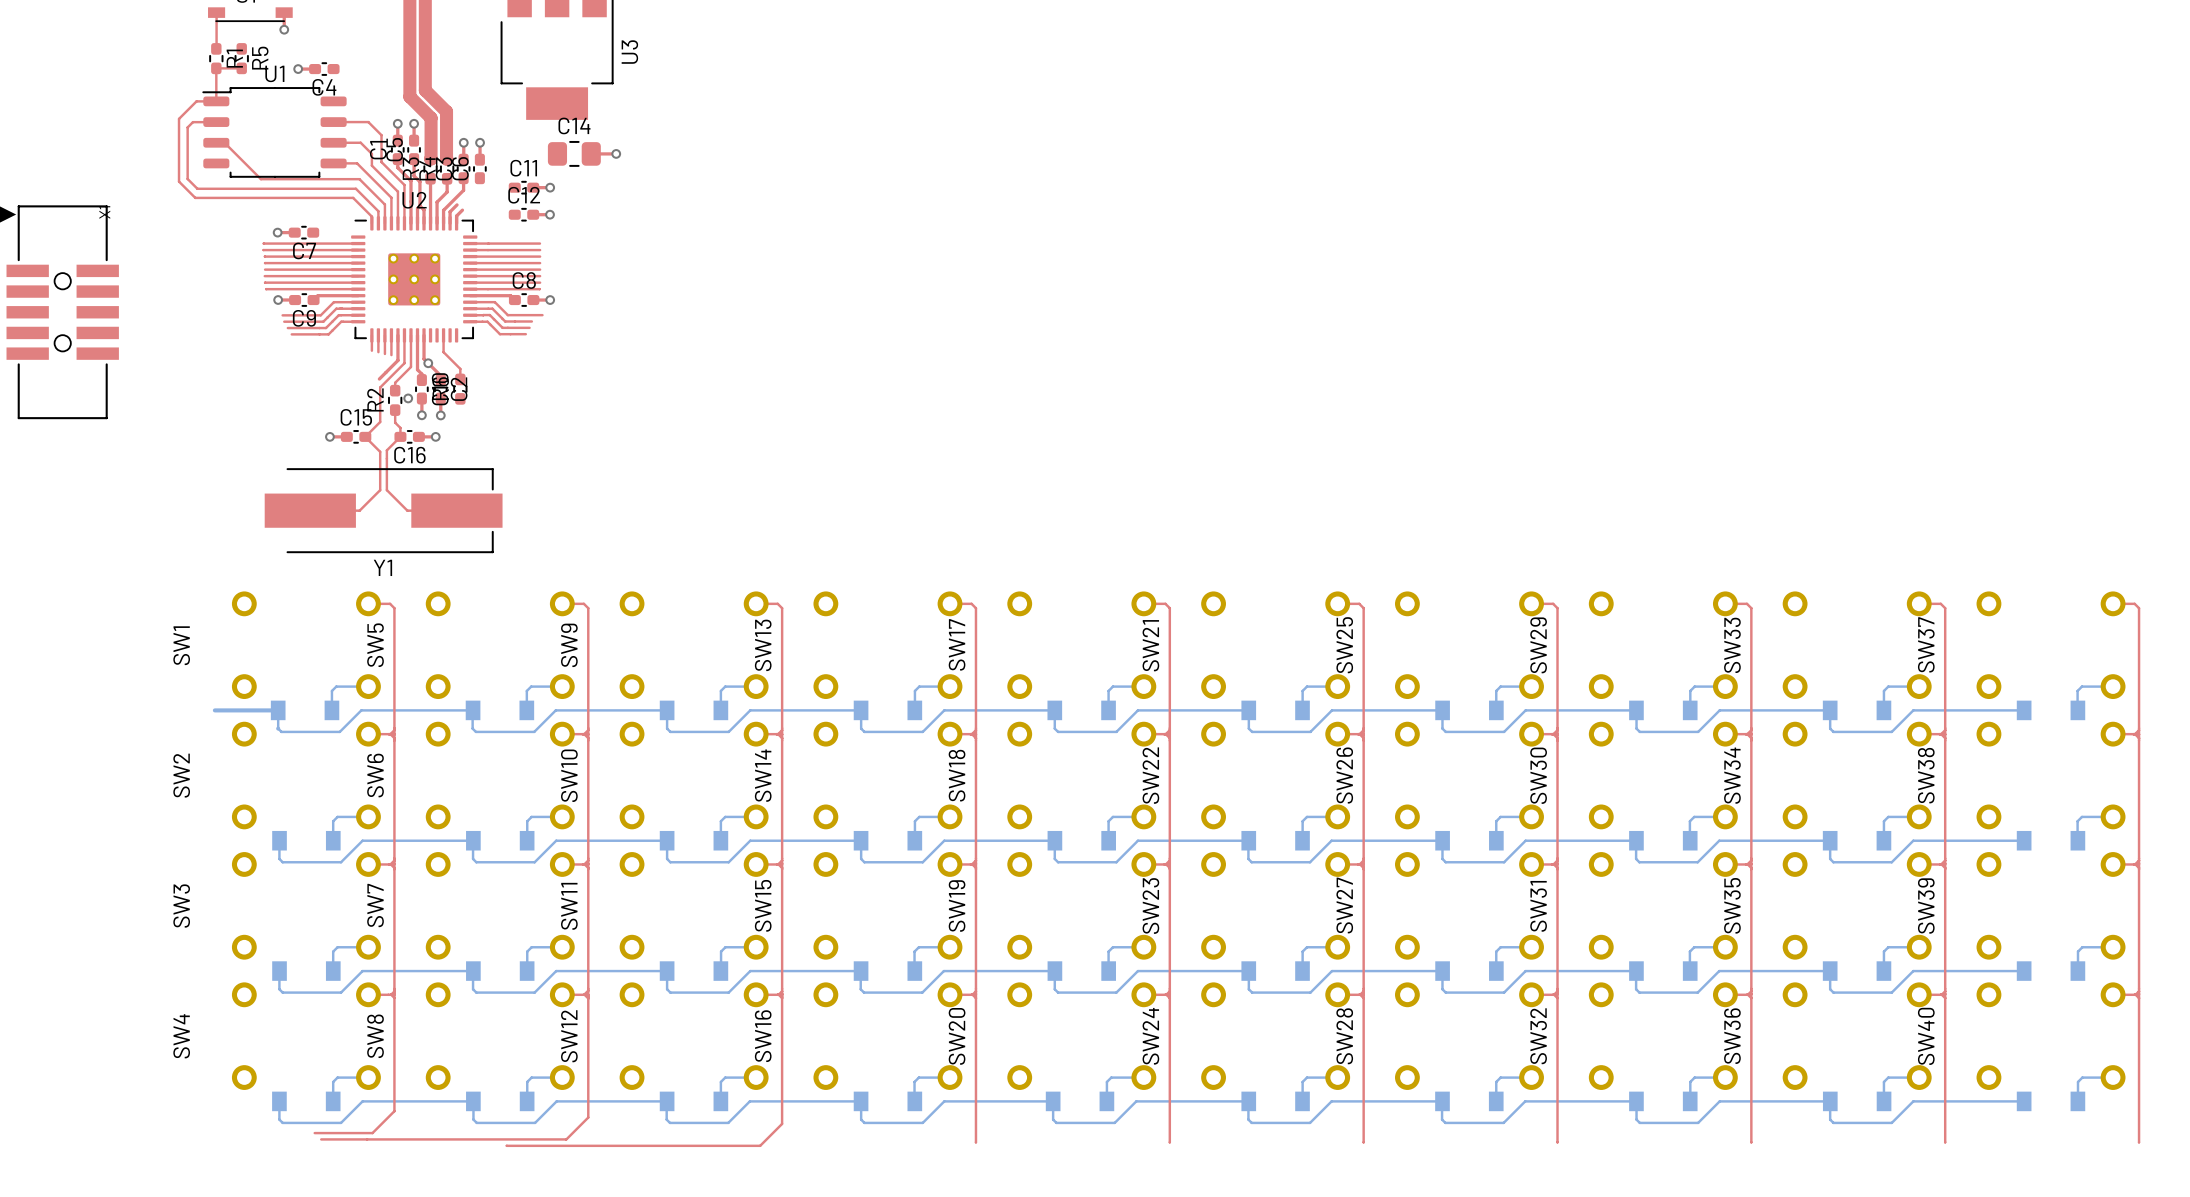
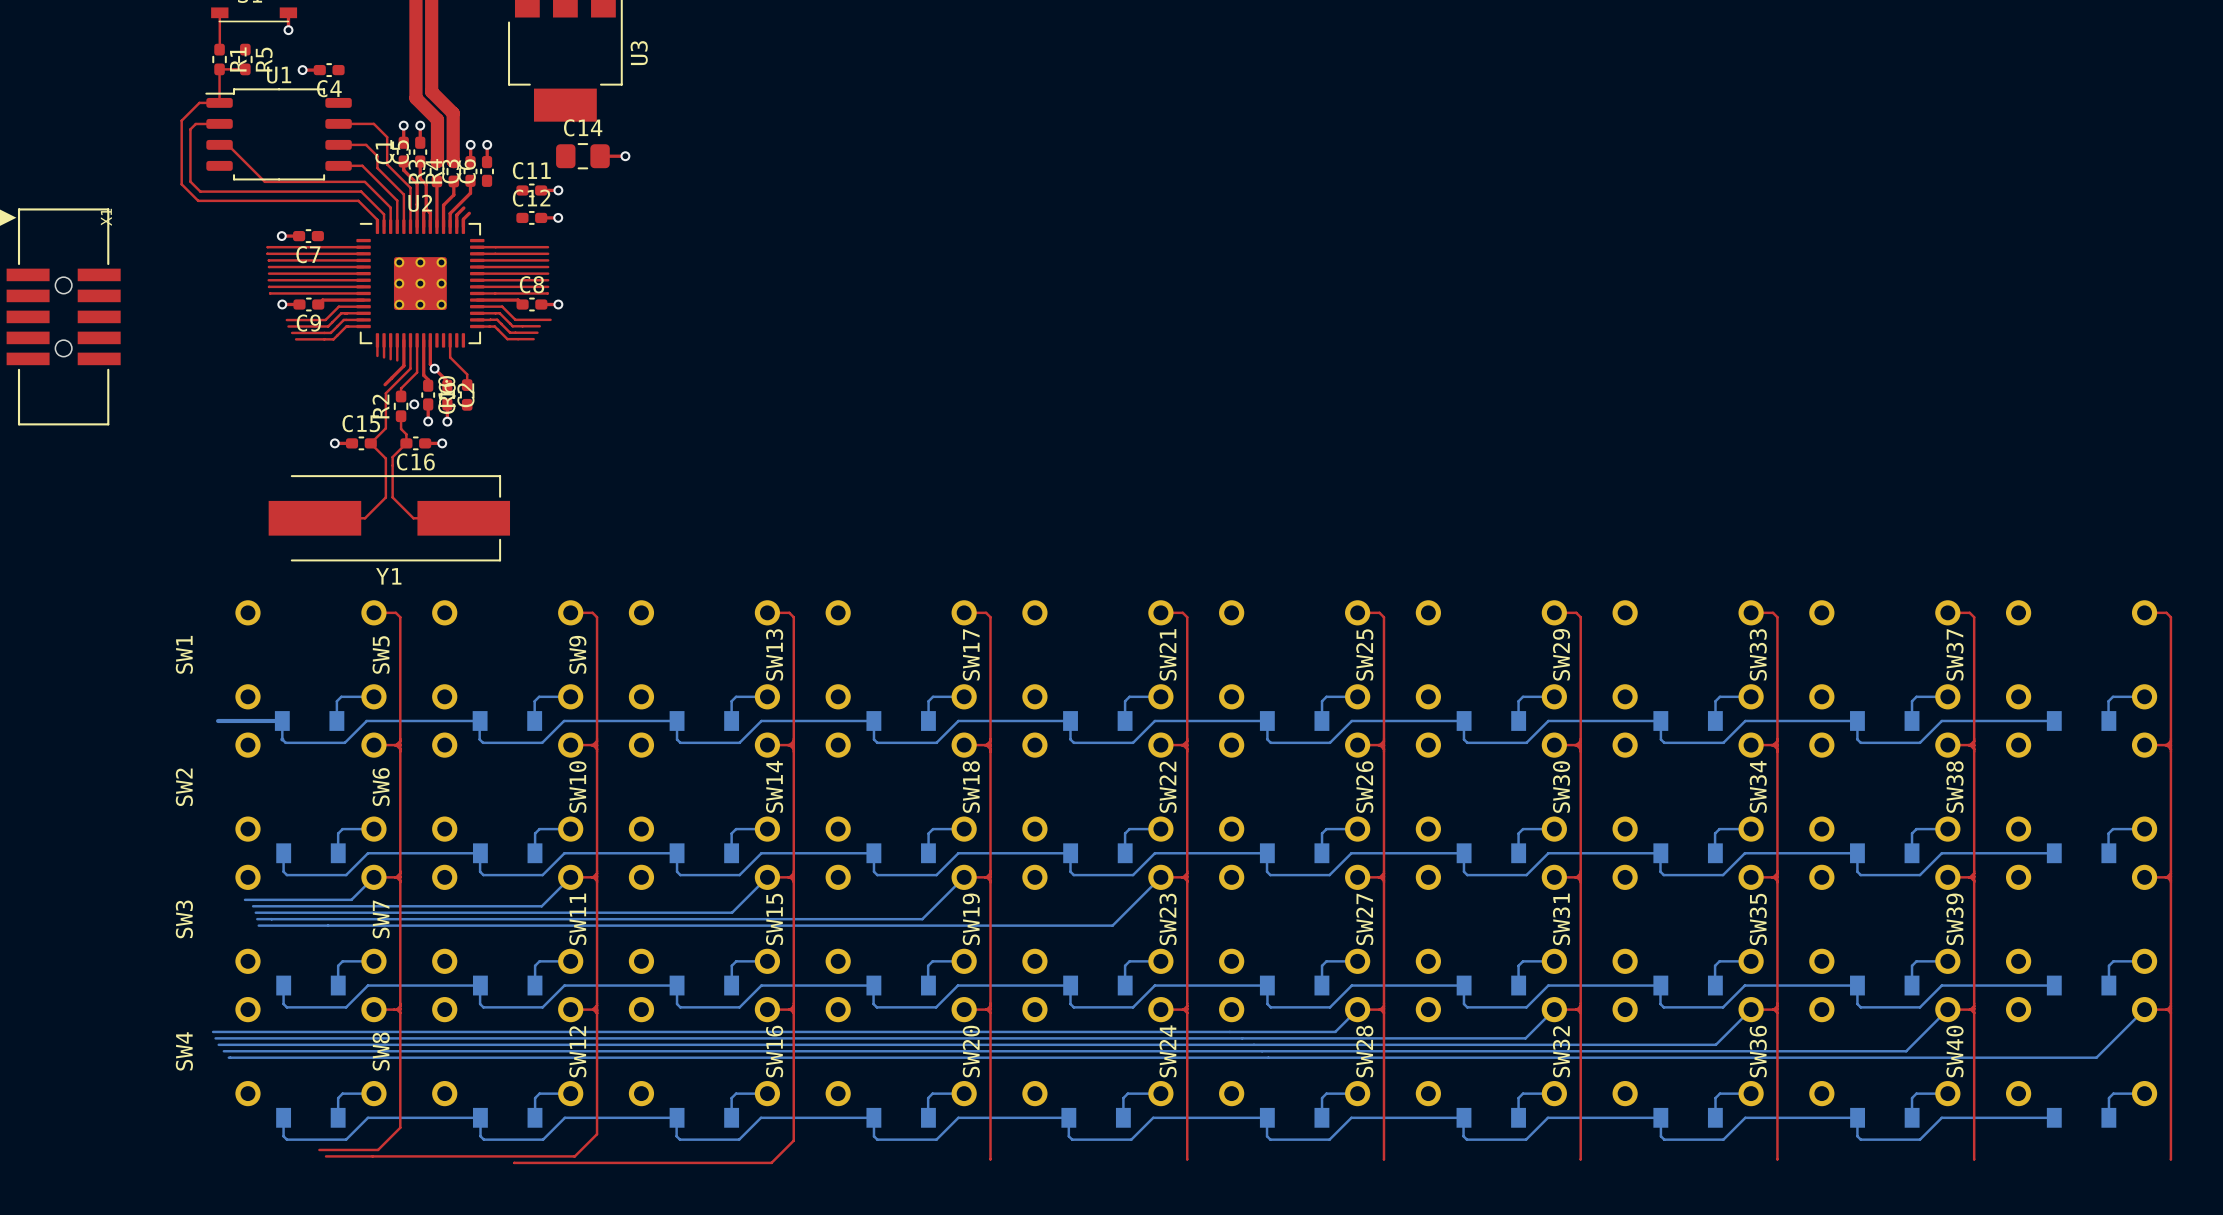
bottom track: none -> (373, 877) (351, 899) (245, 899)
bottom track: none -> (570, 877) (541, 906) (253, 906)
bottom track: none -> (767, 877) (732, 912) (255, 912)
bottom track: none -> (964, 877) (922, 919) (257, 919)
bottom track: none -> (1160, 877) (1112, 925) (258, 925)
bottom track: none -> (1357, 1009) (1335, 1031) (213, 1031)
bottom track: none -> (1554, 1009) (1525, 1038) (215, 1038)
bottom track: none -> (1751, 1009) (1715, 1044) (218, 1044)
bottom track: none -> (1947, 1009) (1906, 1051) (223, 1051)
bottom track: none -> (2144, 1009) (2096, 1057) (228, 1057)

